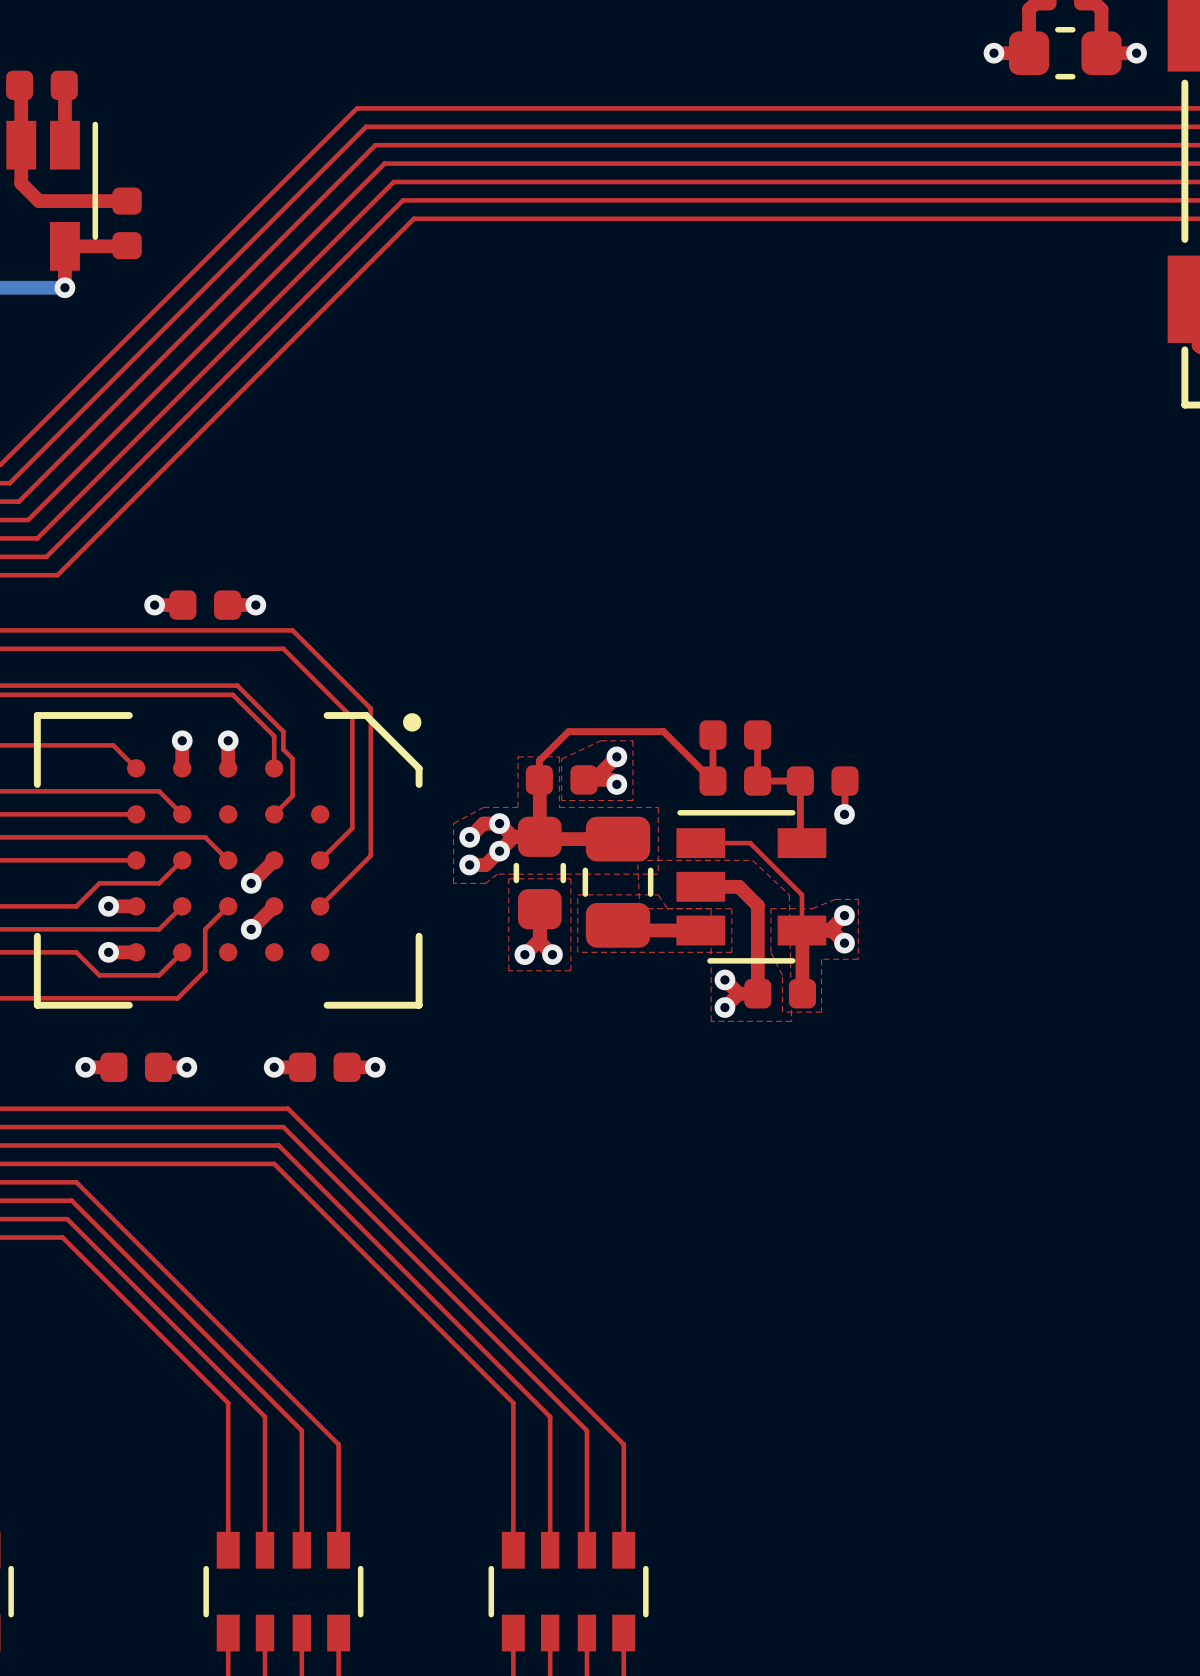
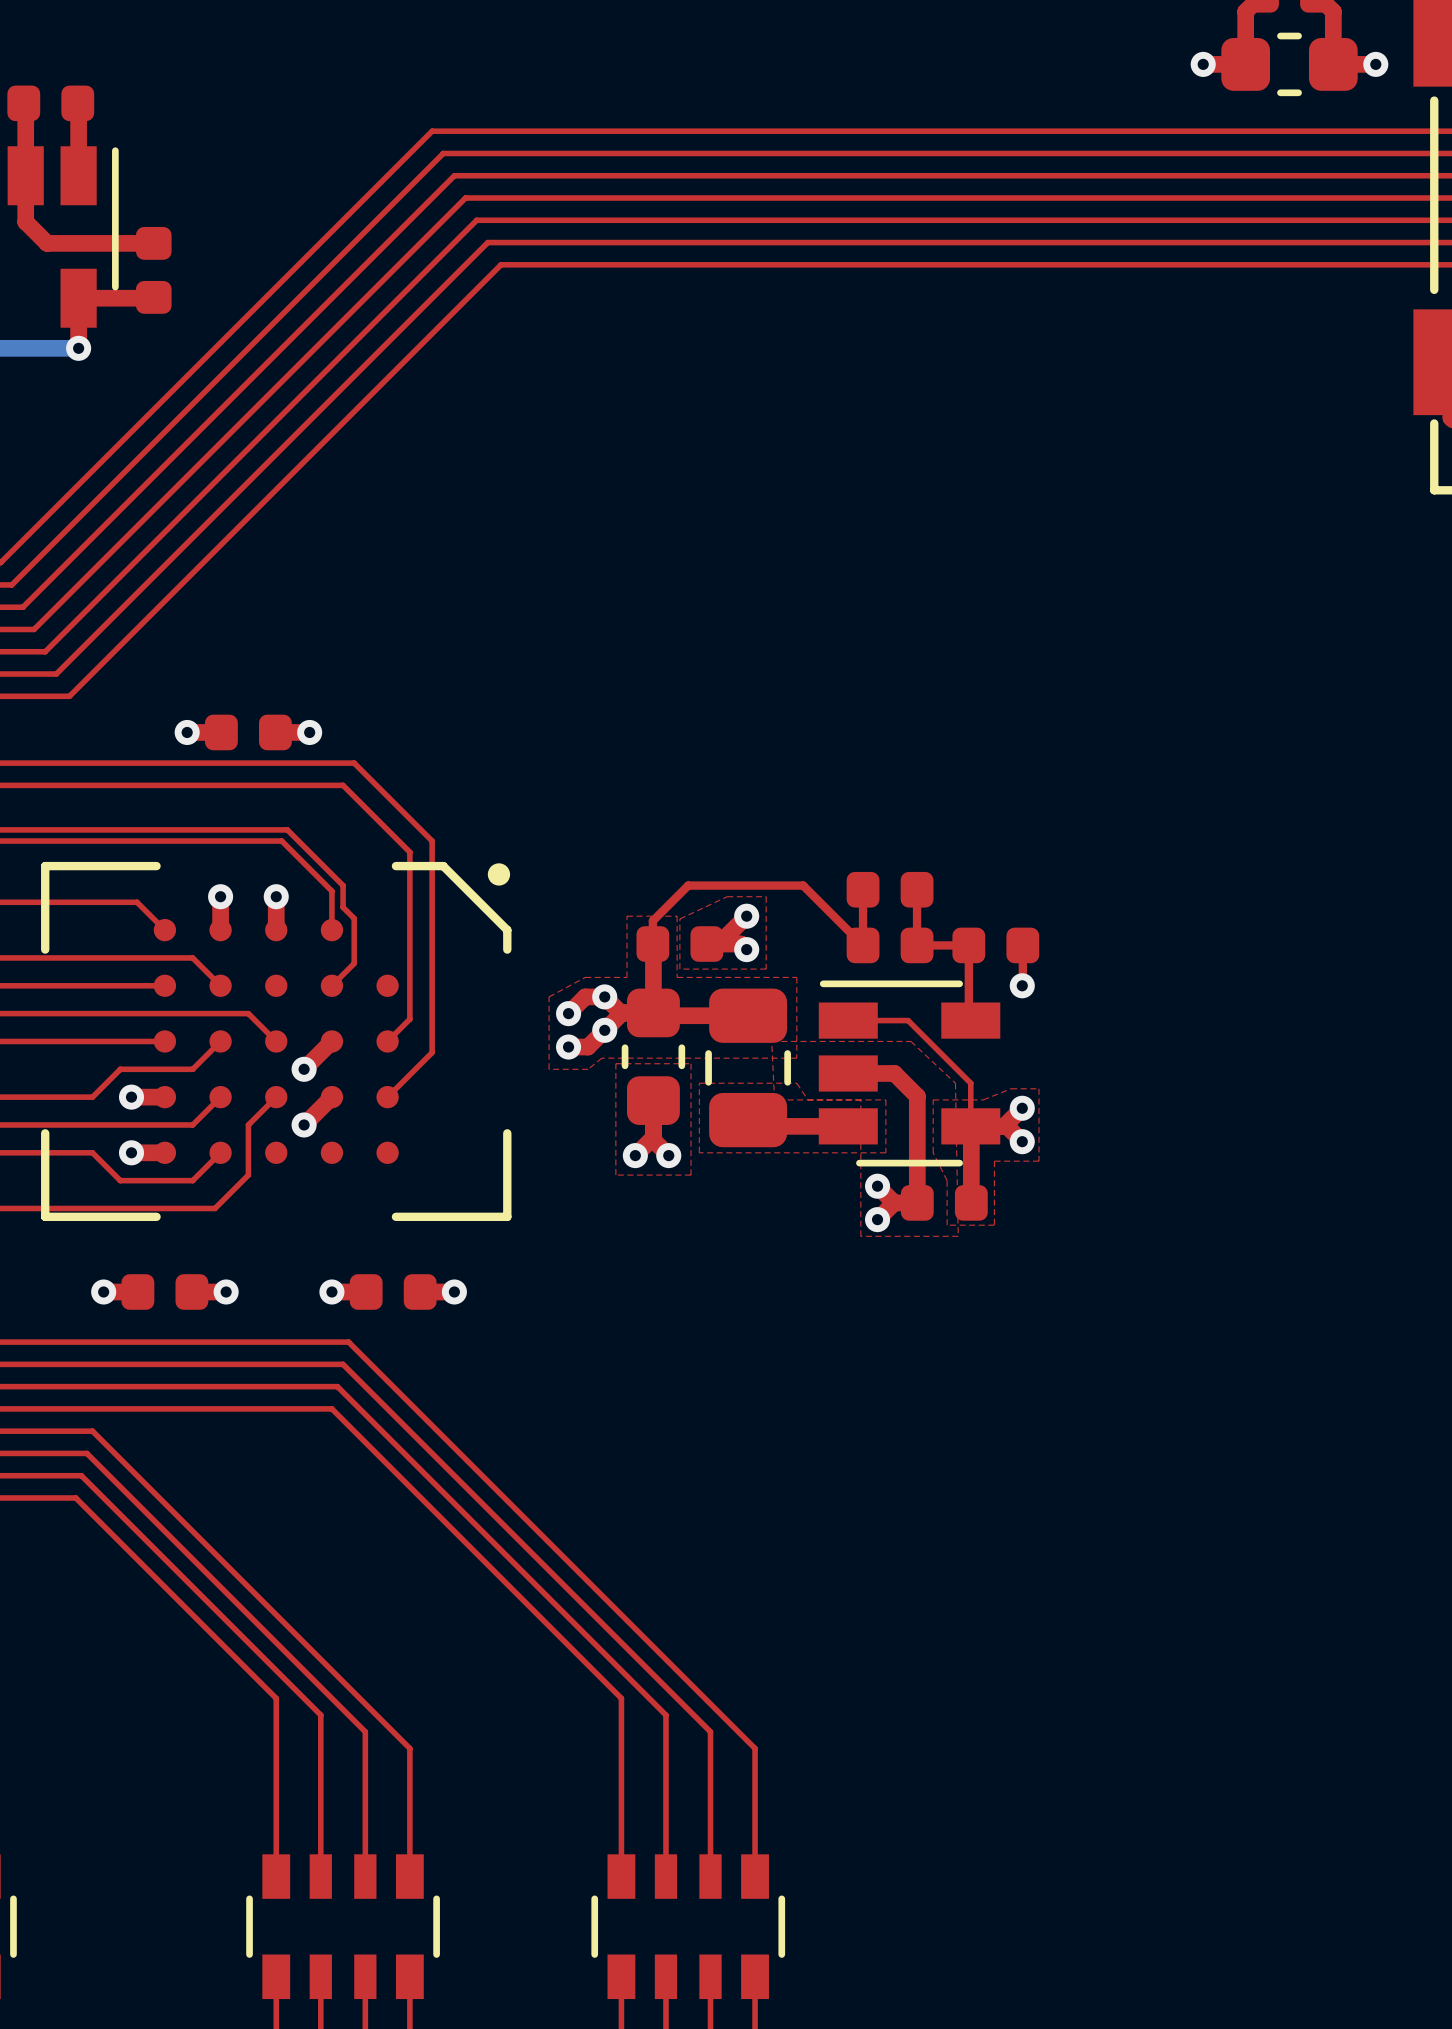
top track: (357, 694) (370, 708) (370, 855) (357, 869) -> (432, 841) (432, 1052)
top track: (338, 703) (352, 717) (352, 828) (338, 841) -> (409, 852) (409, 1019)

